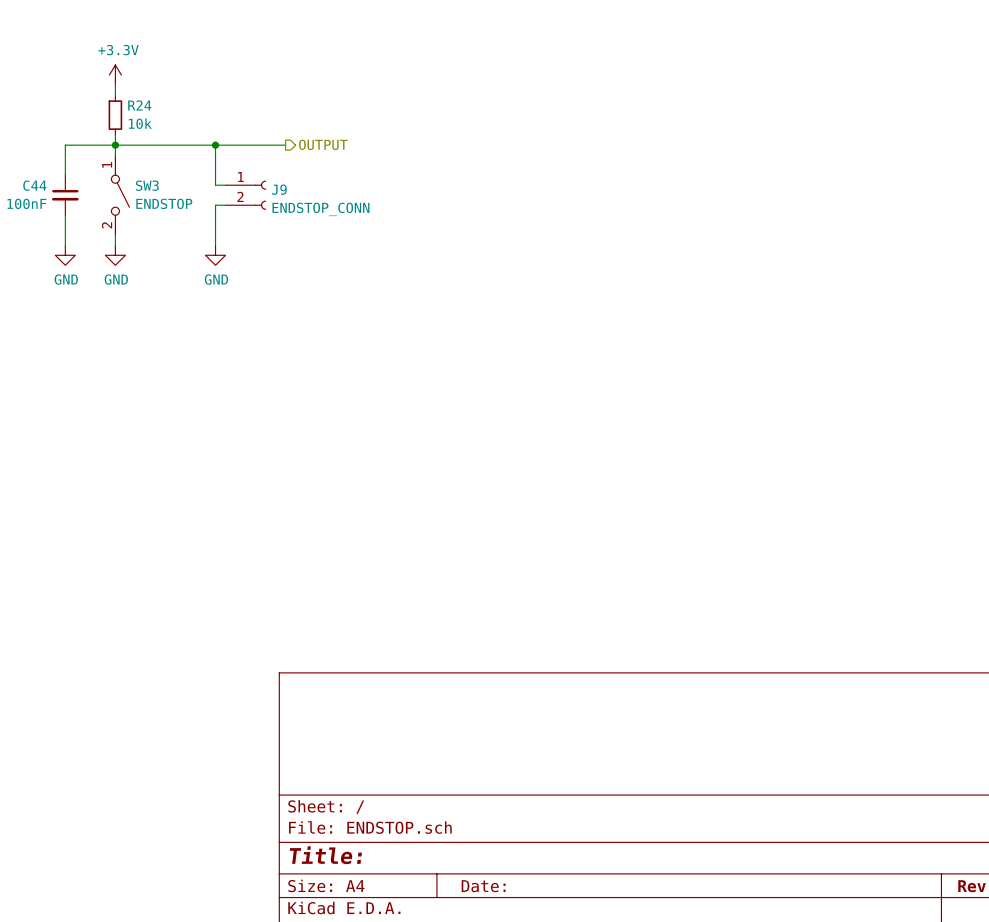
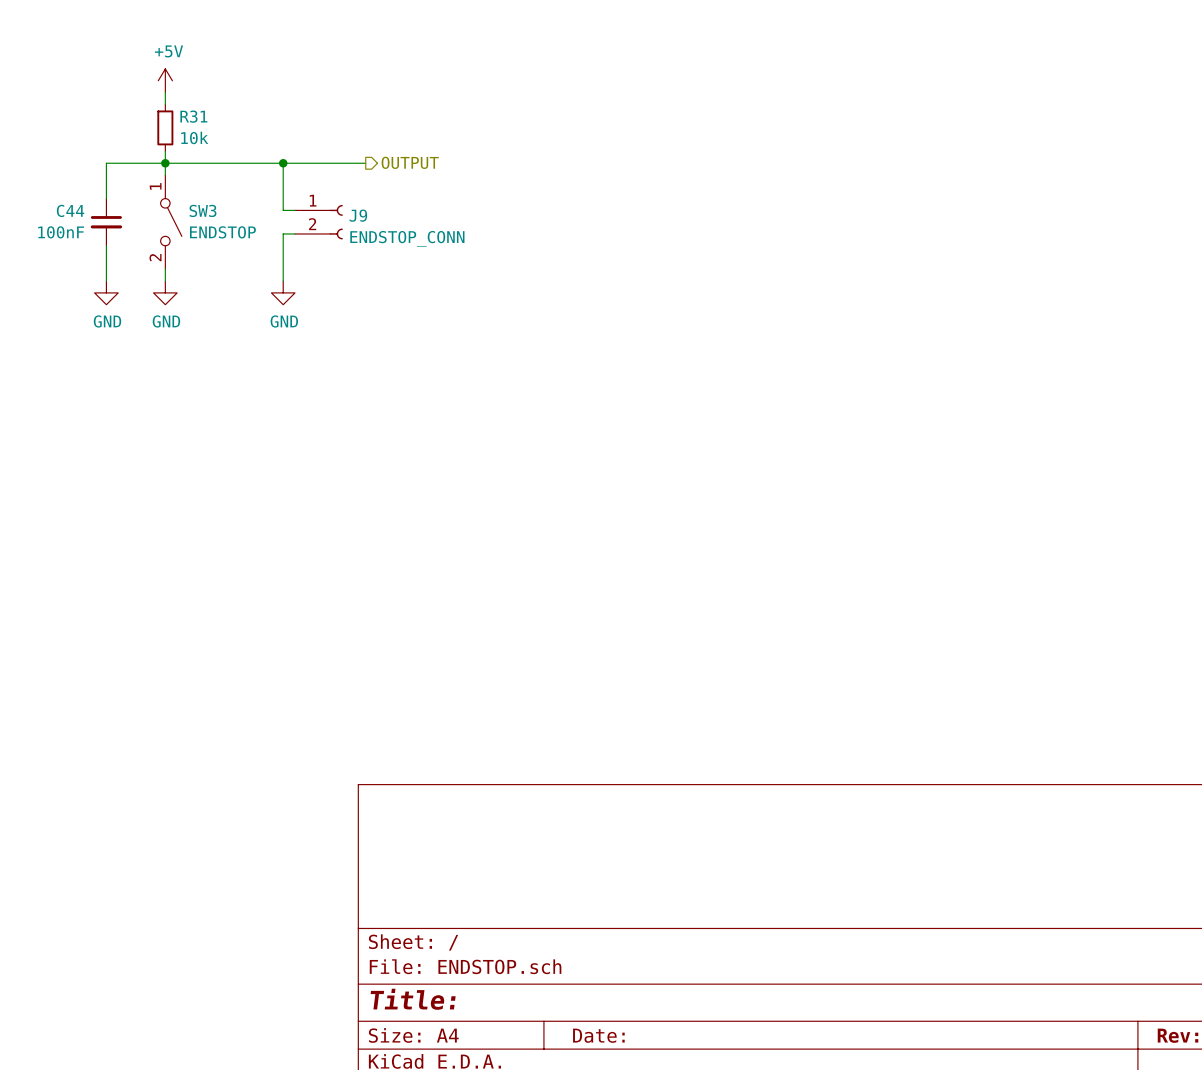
power symbol: +3.3V (115, 75) -> +5V (165, 80)
R24 name: R24 (139, 105) -> R31 (193, 116)

